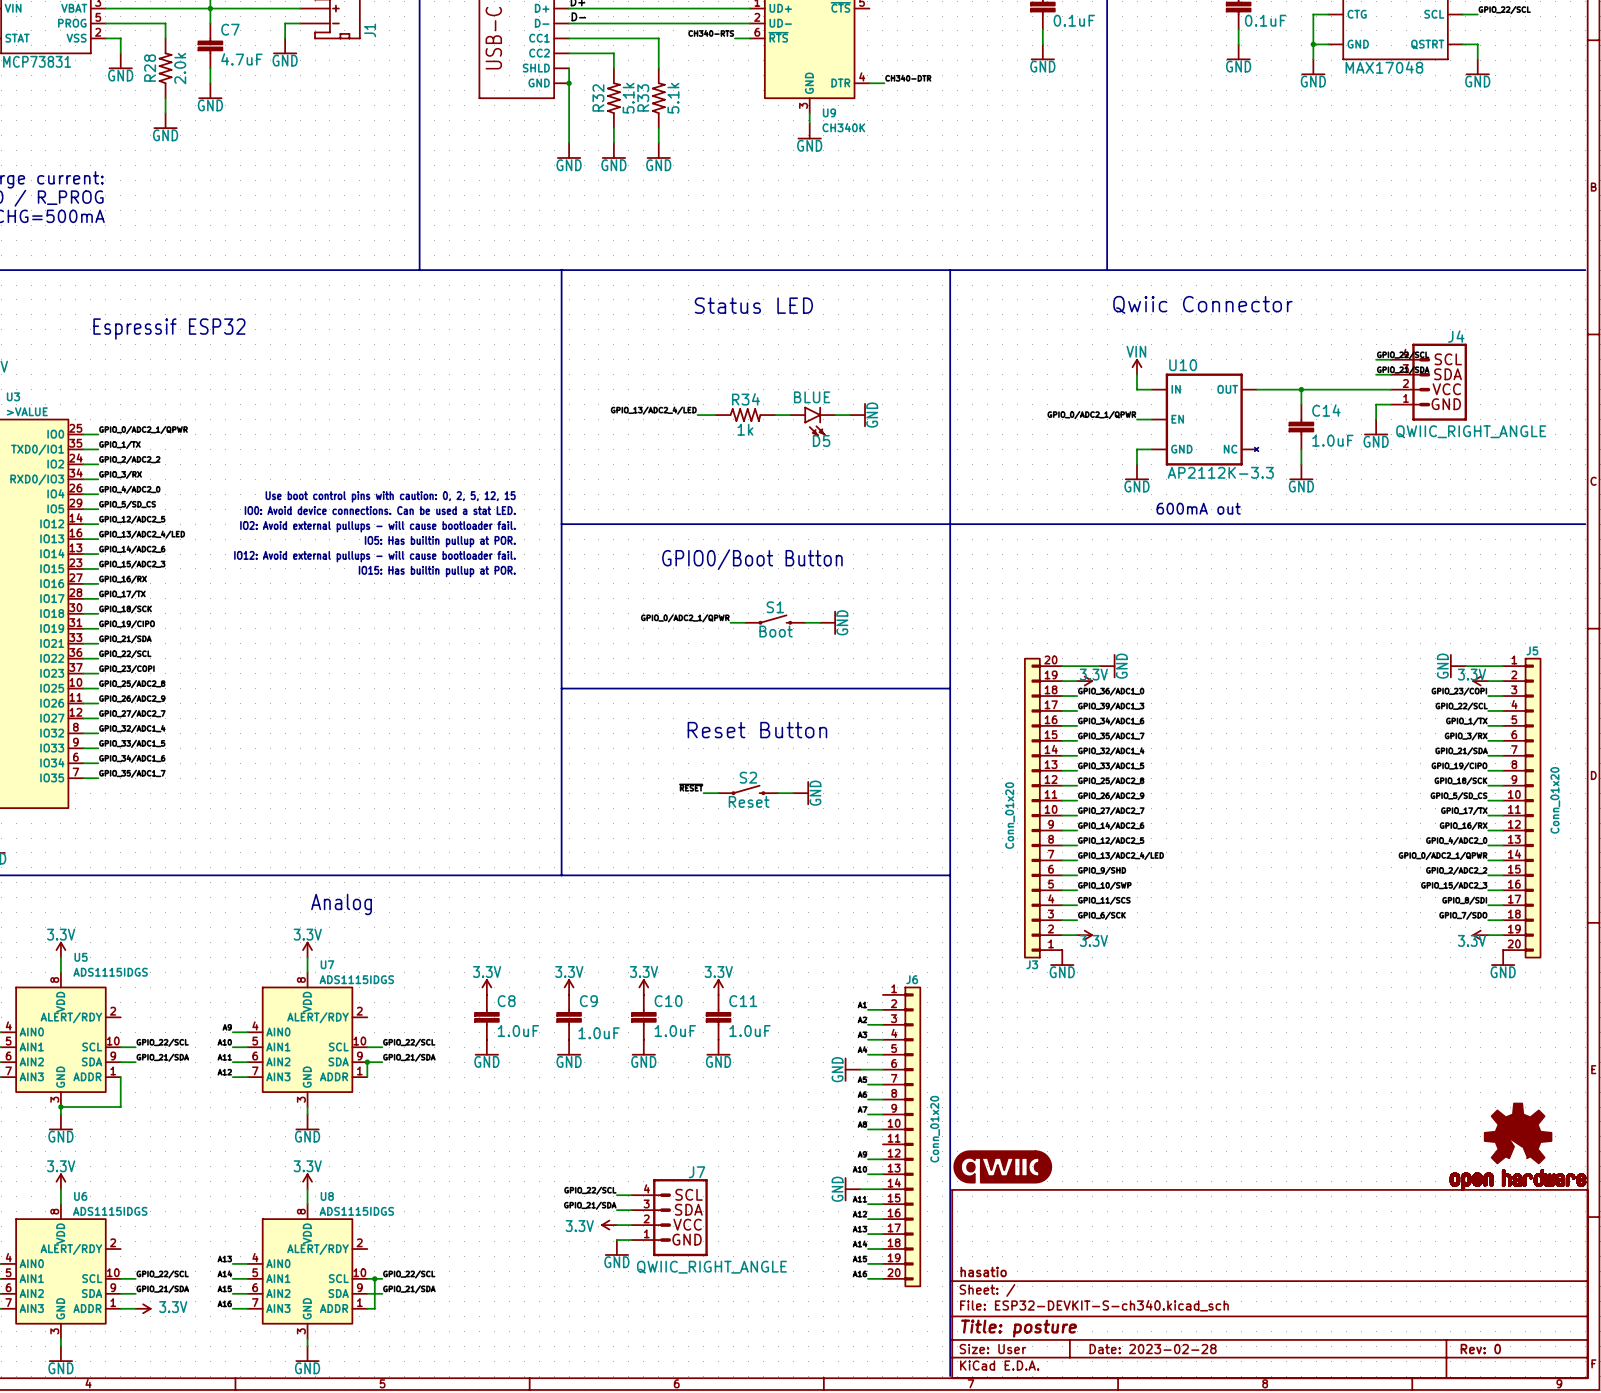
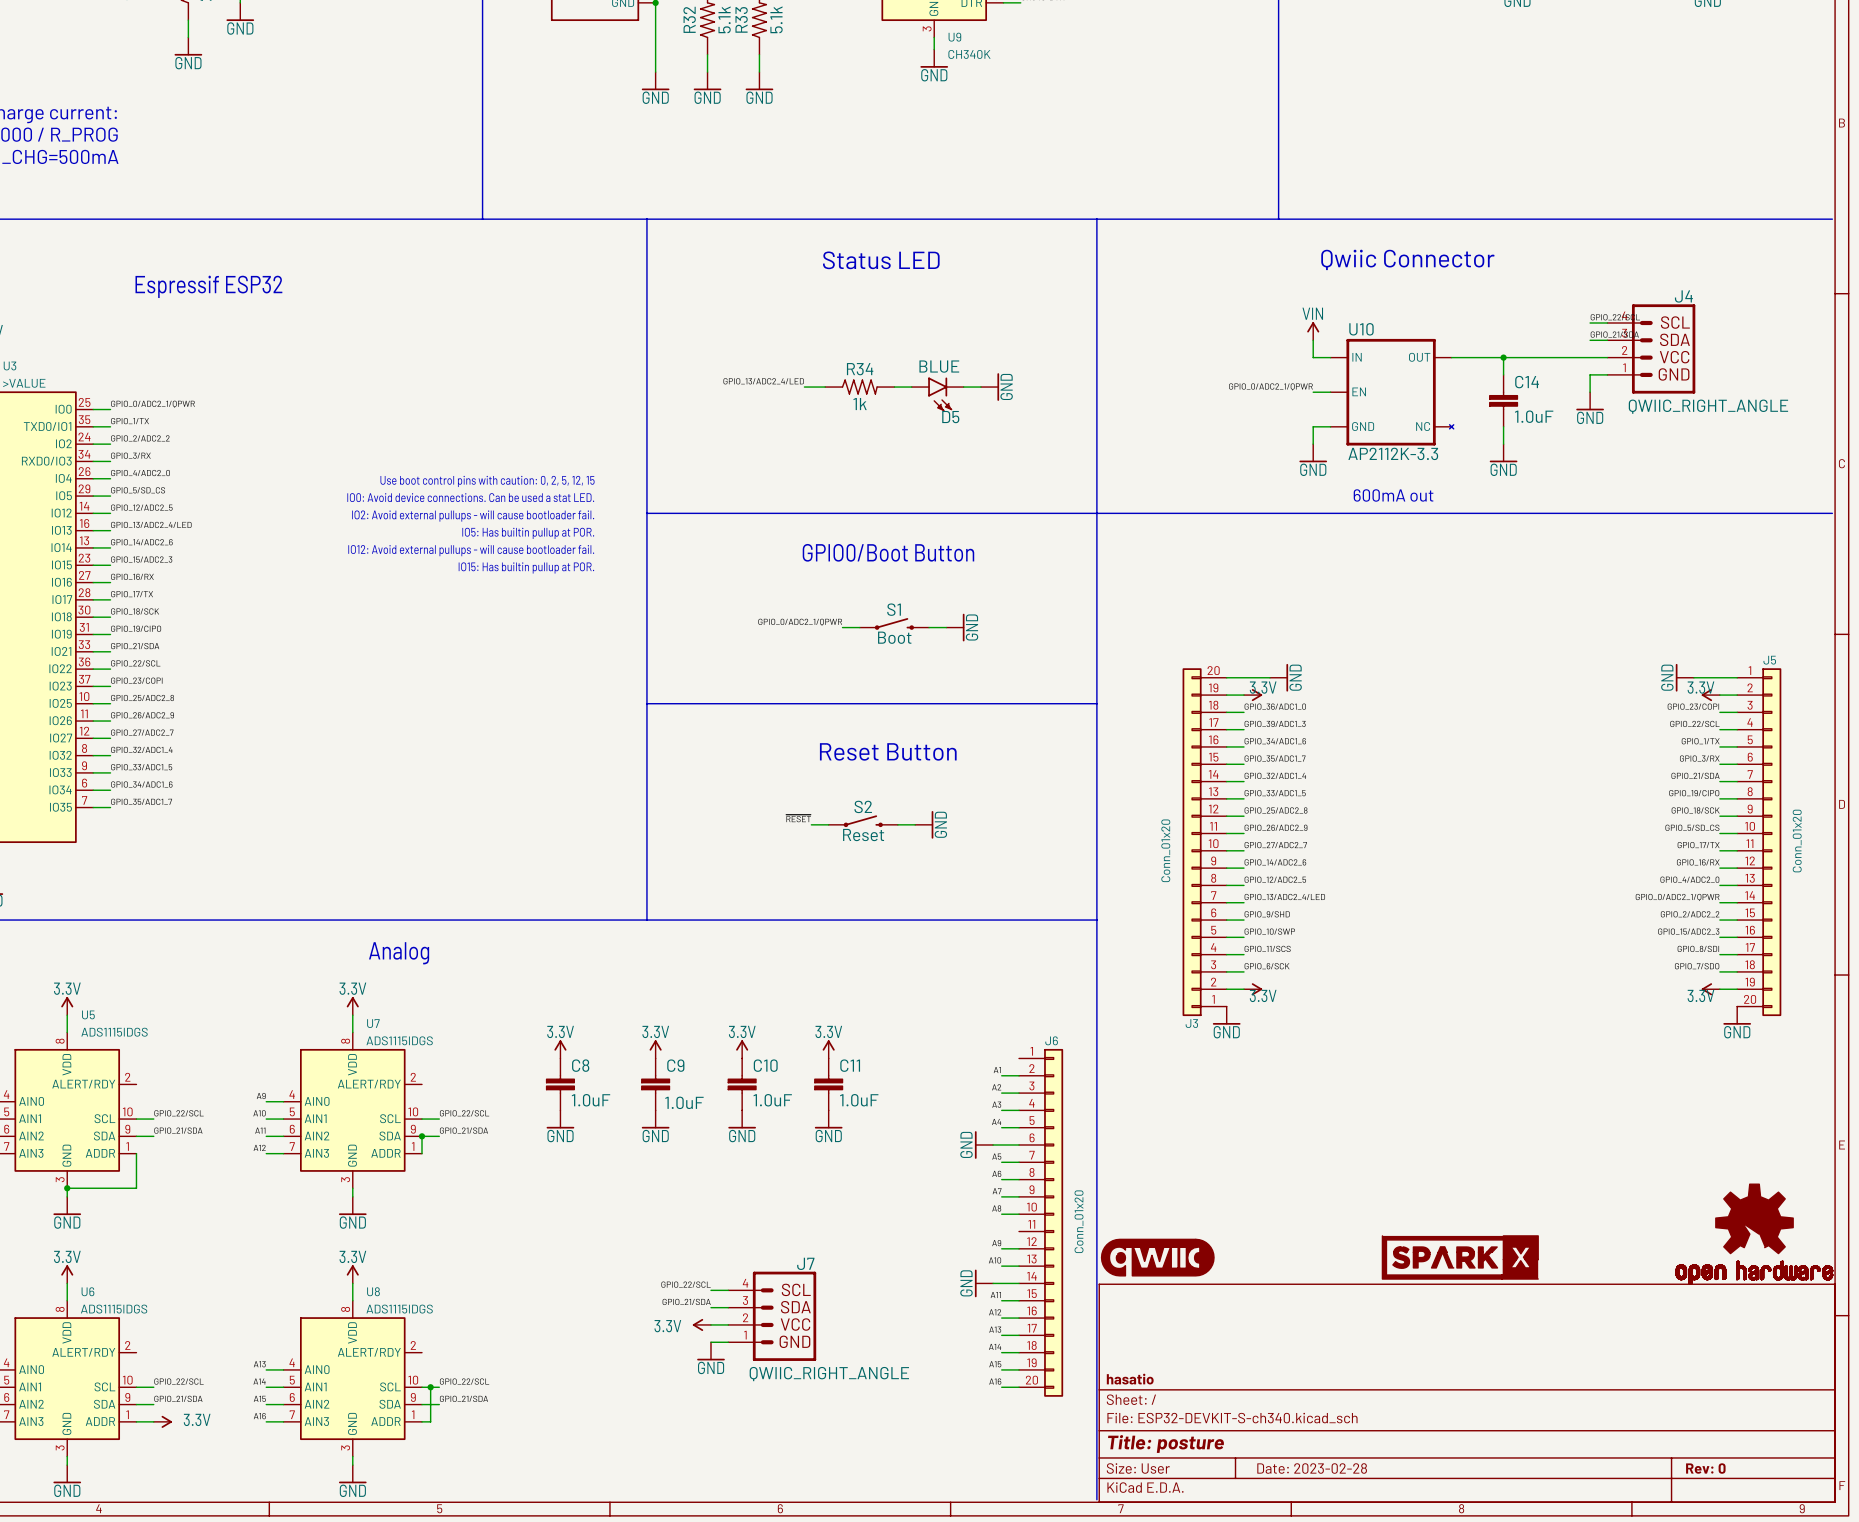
part: none -> (1460, 1257)

